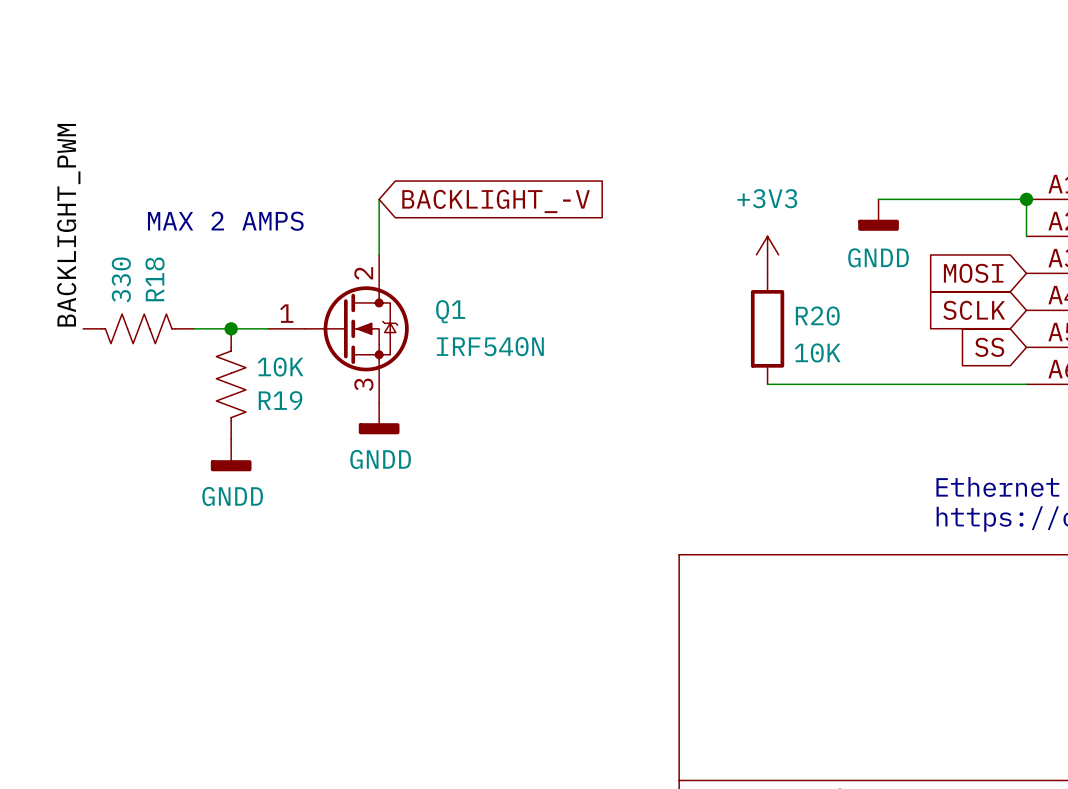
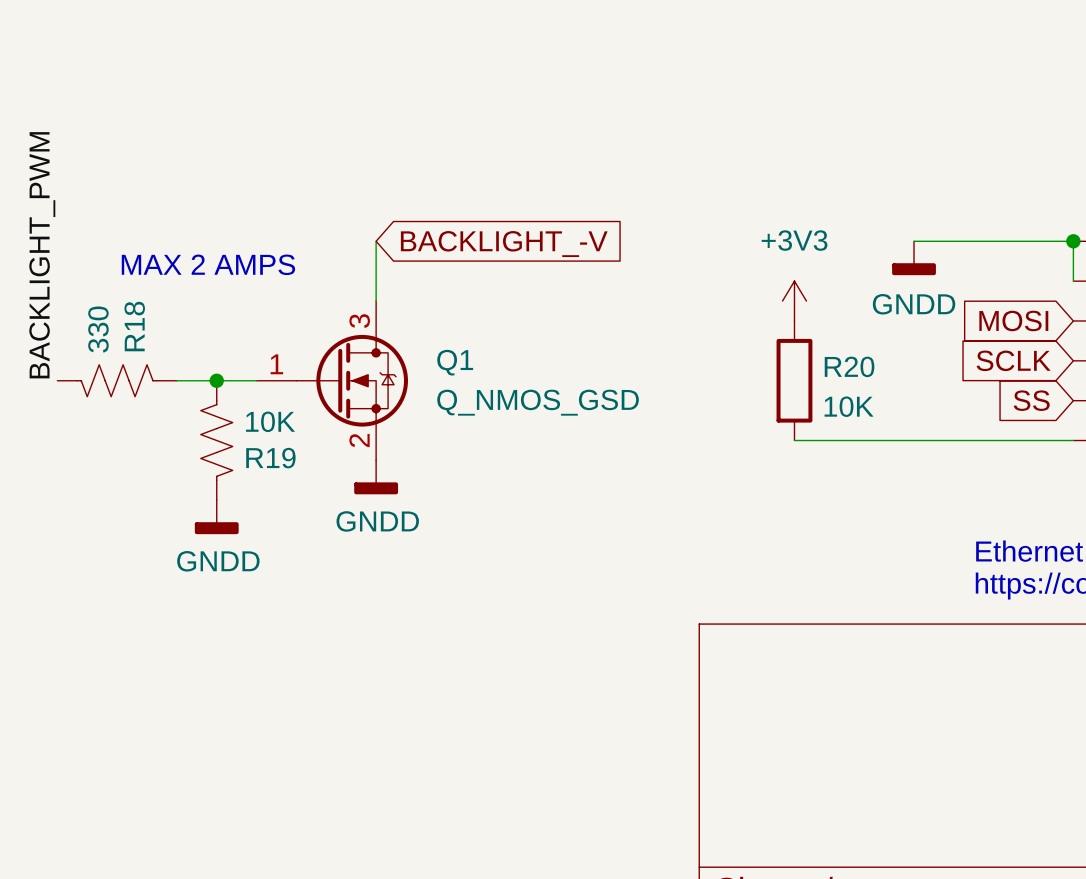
Q1 pin number: 2 (363, 273) -> 3 (359, 321)
Q1 value: IRF540N (490, 346) -> Q_NMOS_GSD (538, 402)
Q1 pin number: 3 (363, 384) -> 2 (359, 440)

